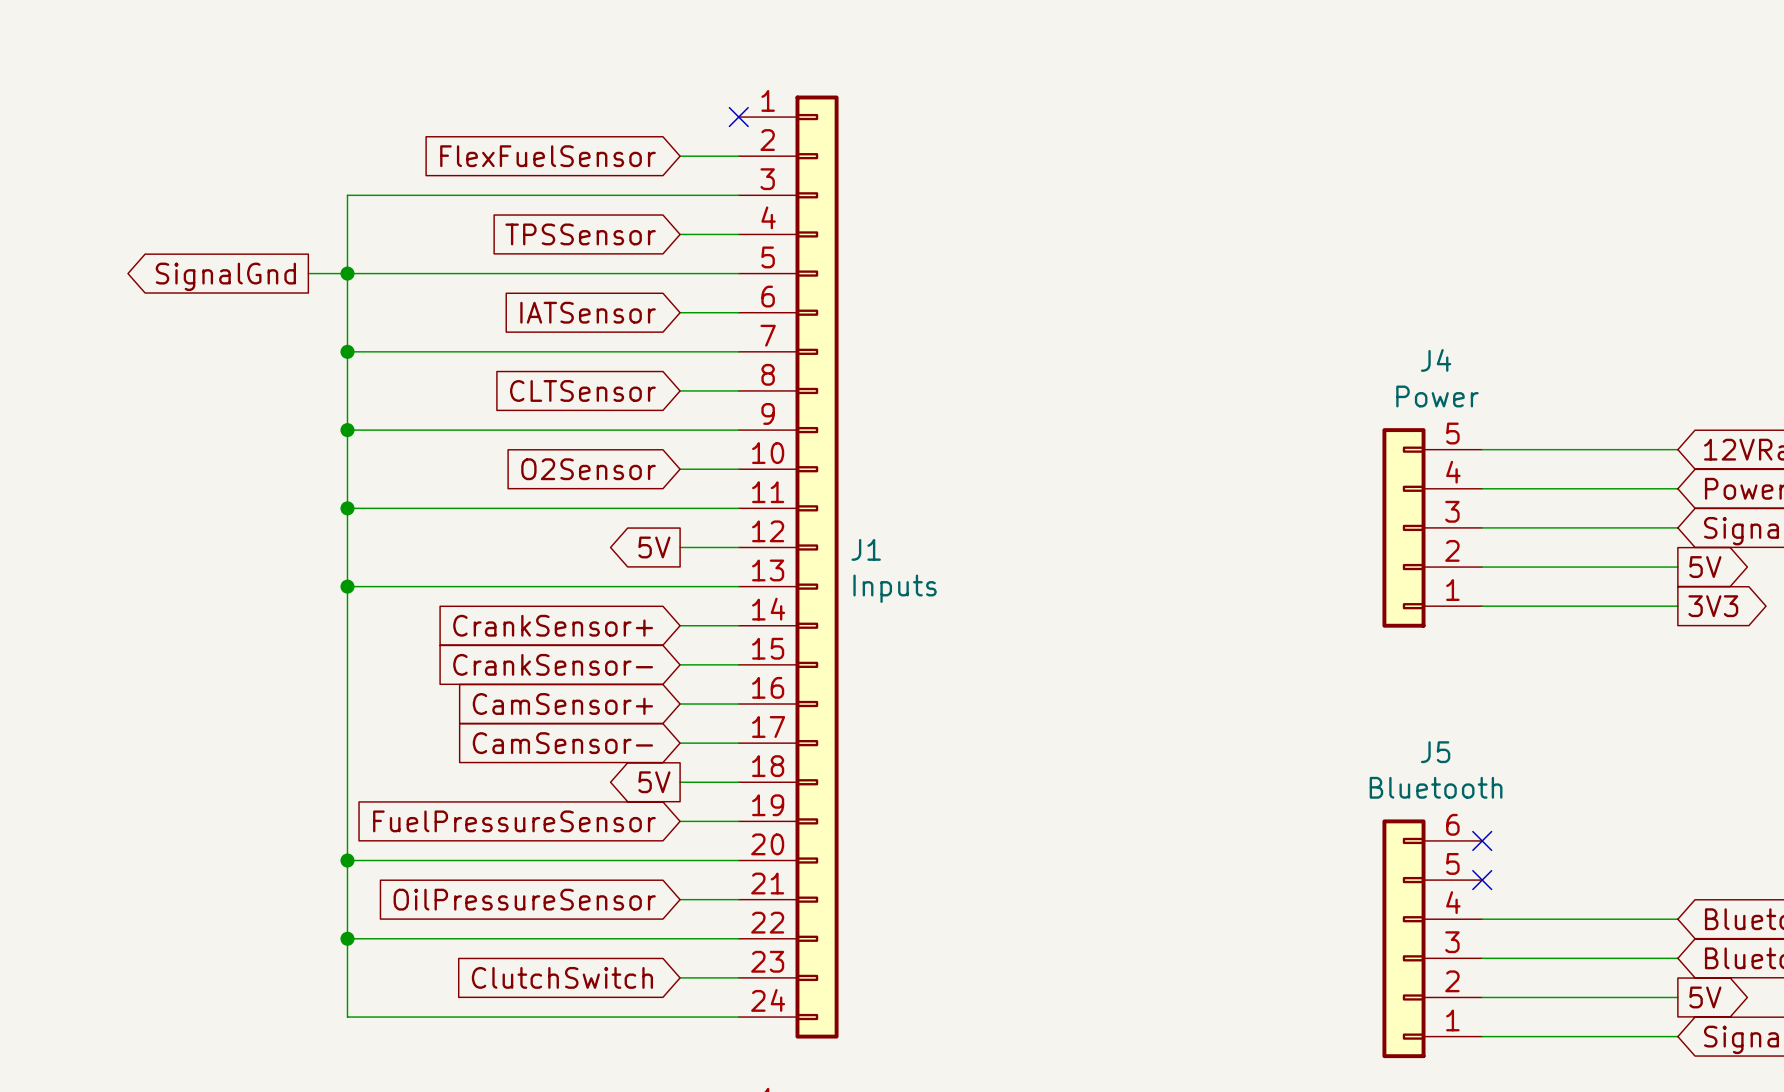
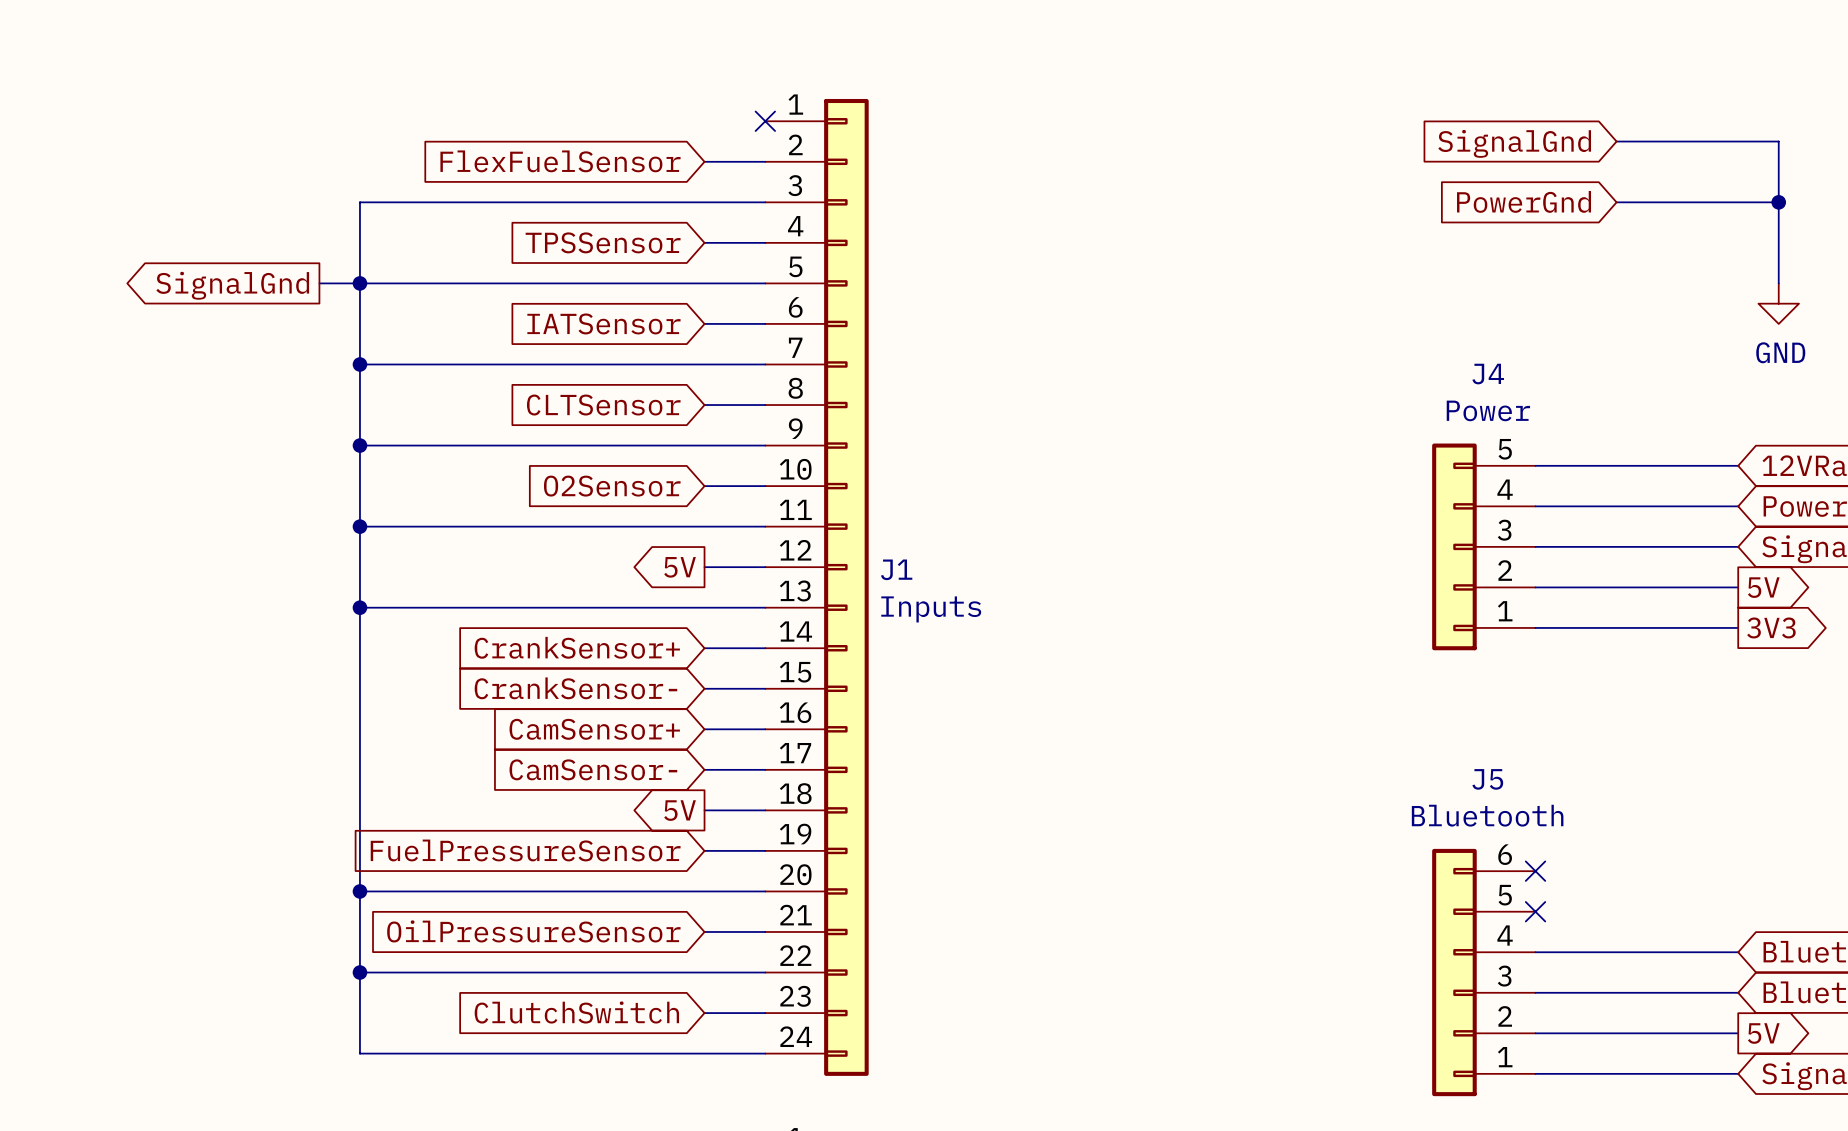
wire: none -> (1616, 141) (1778, 141) (1778, 283)
global label: none -> SignalGnd (1514, 143)
global label: none -> PowerGnd (1524, 201)
wire: none -> (1616, 202) (1778, 202)
junction: none -> (1778, 202)
power symbol: none -> GND (1778, 303)

